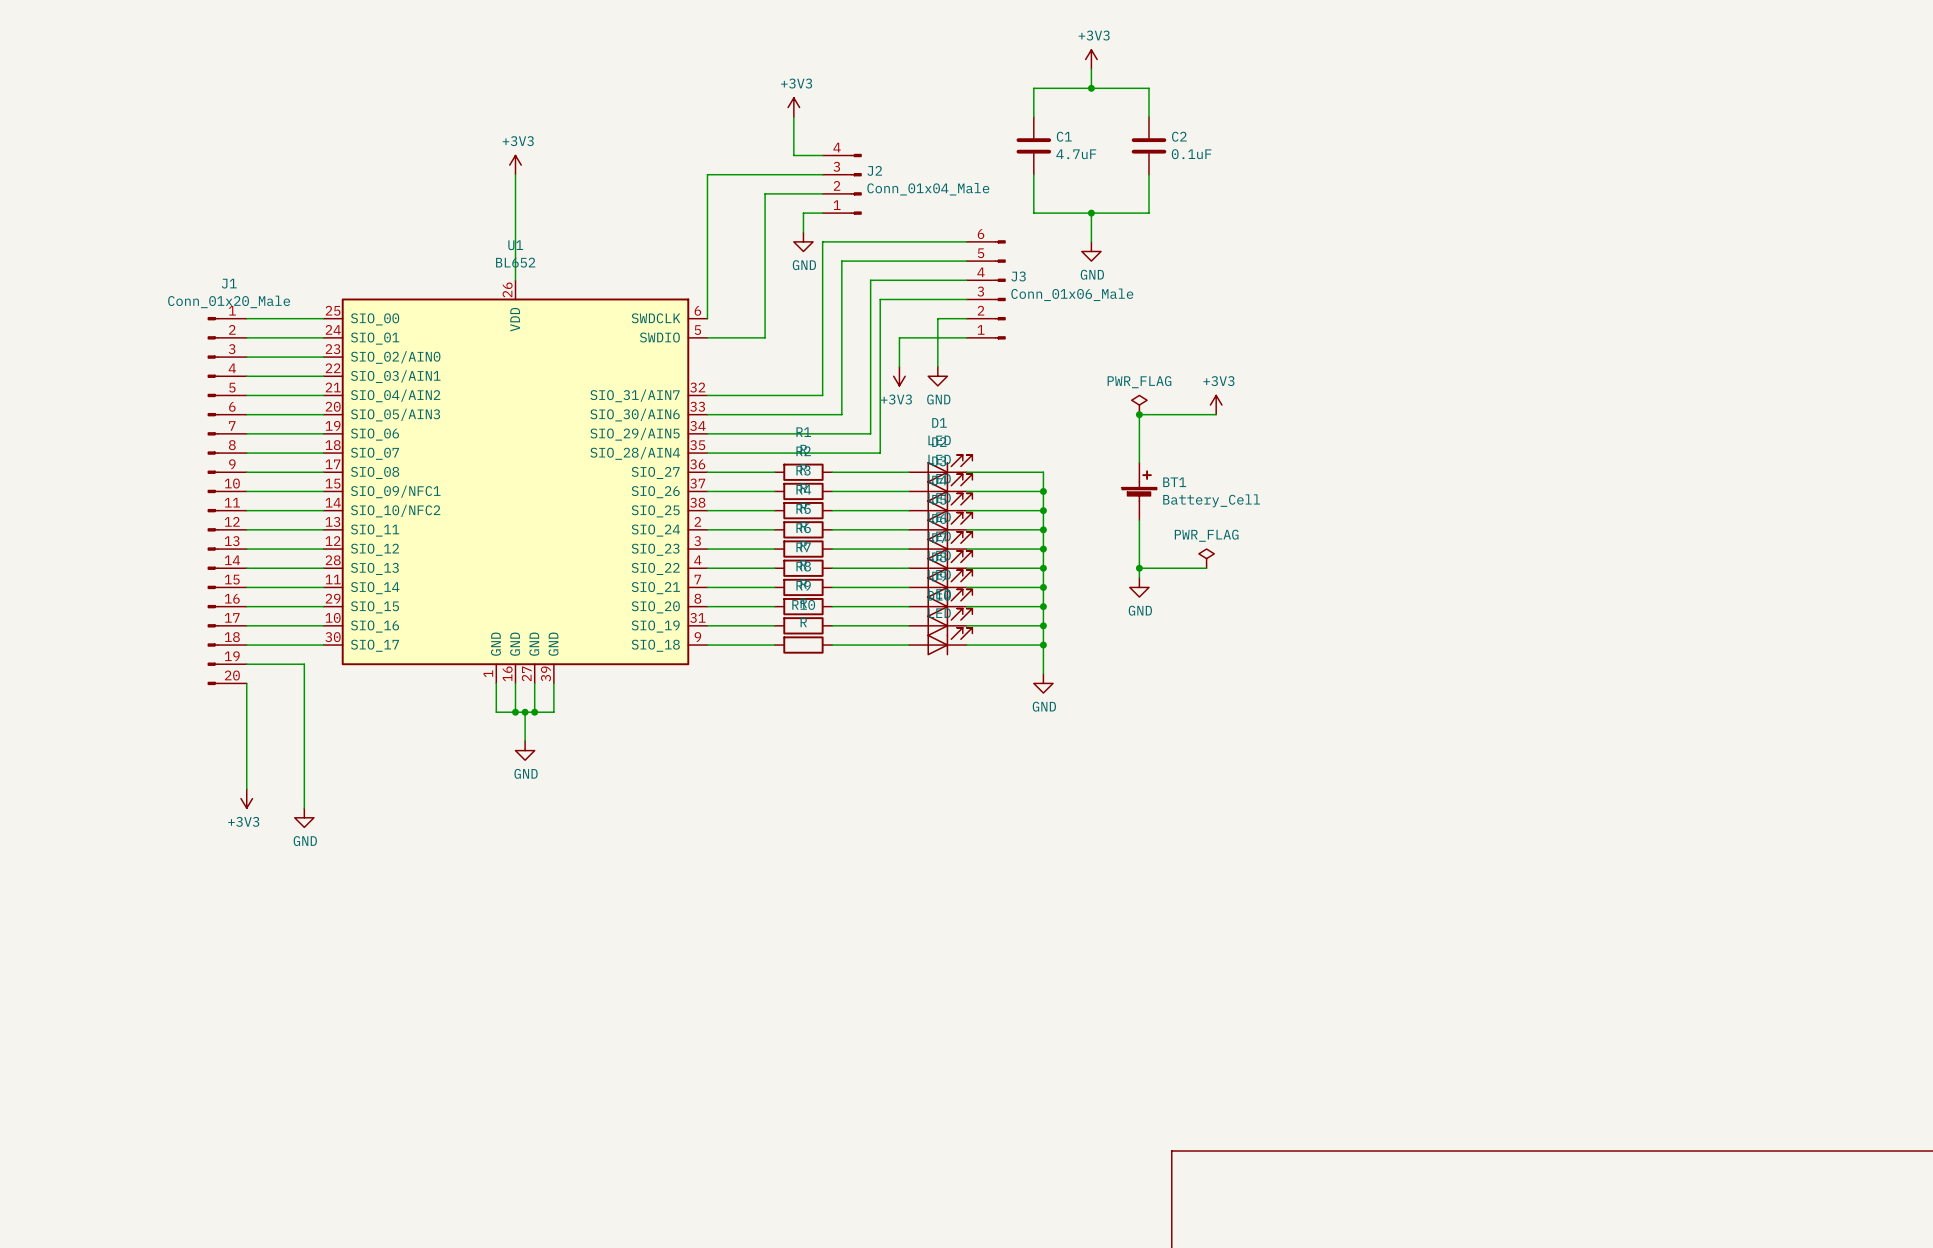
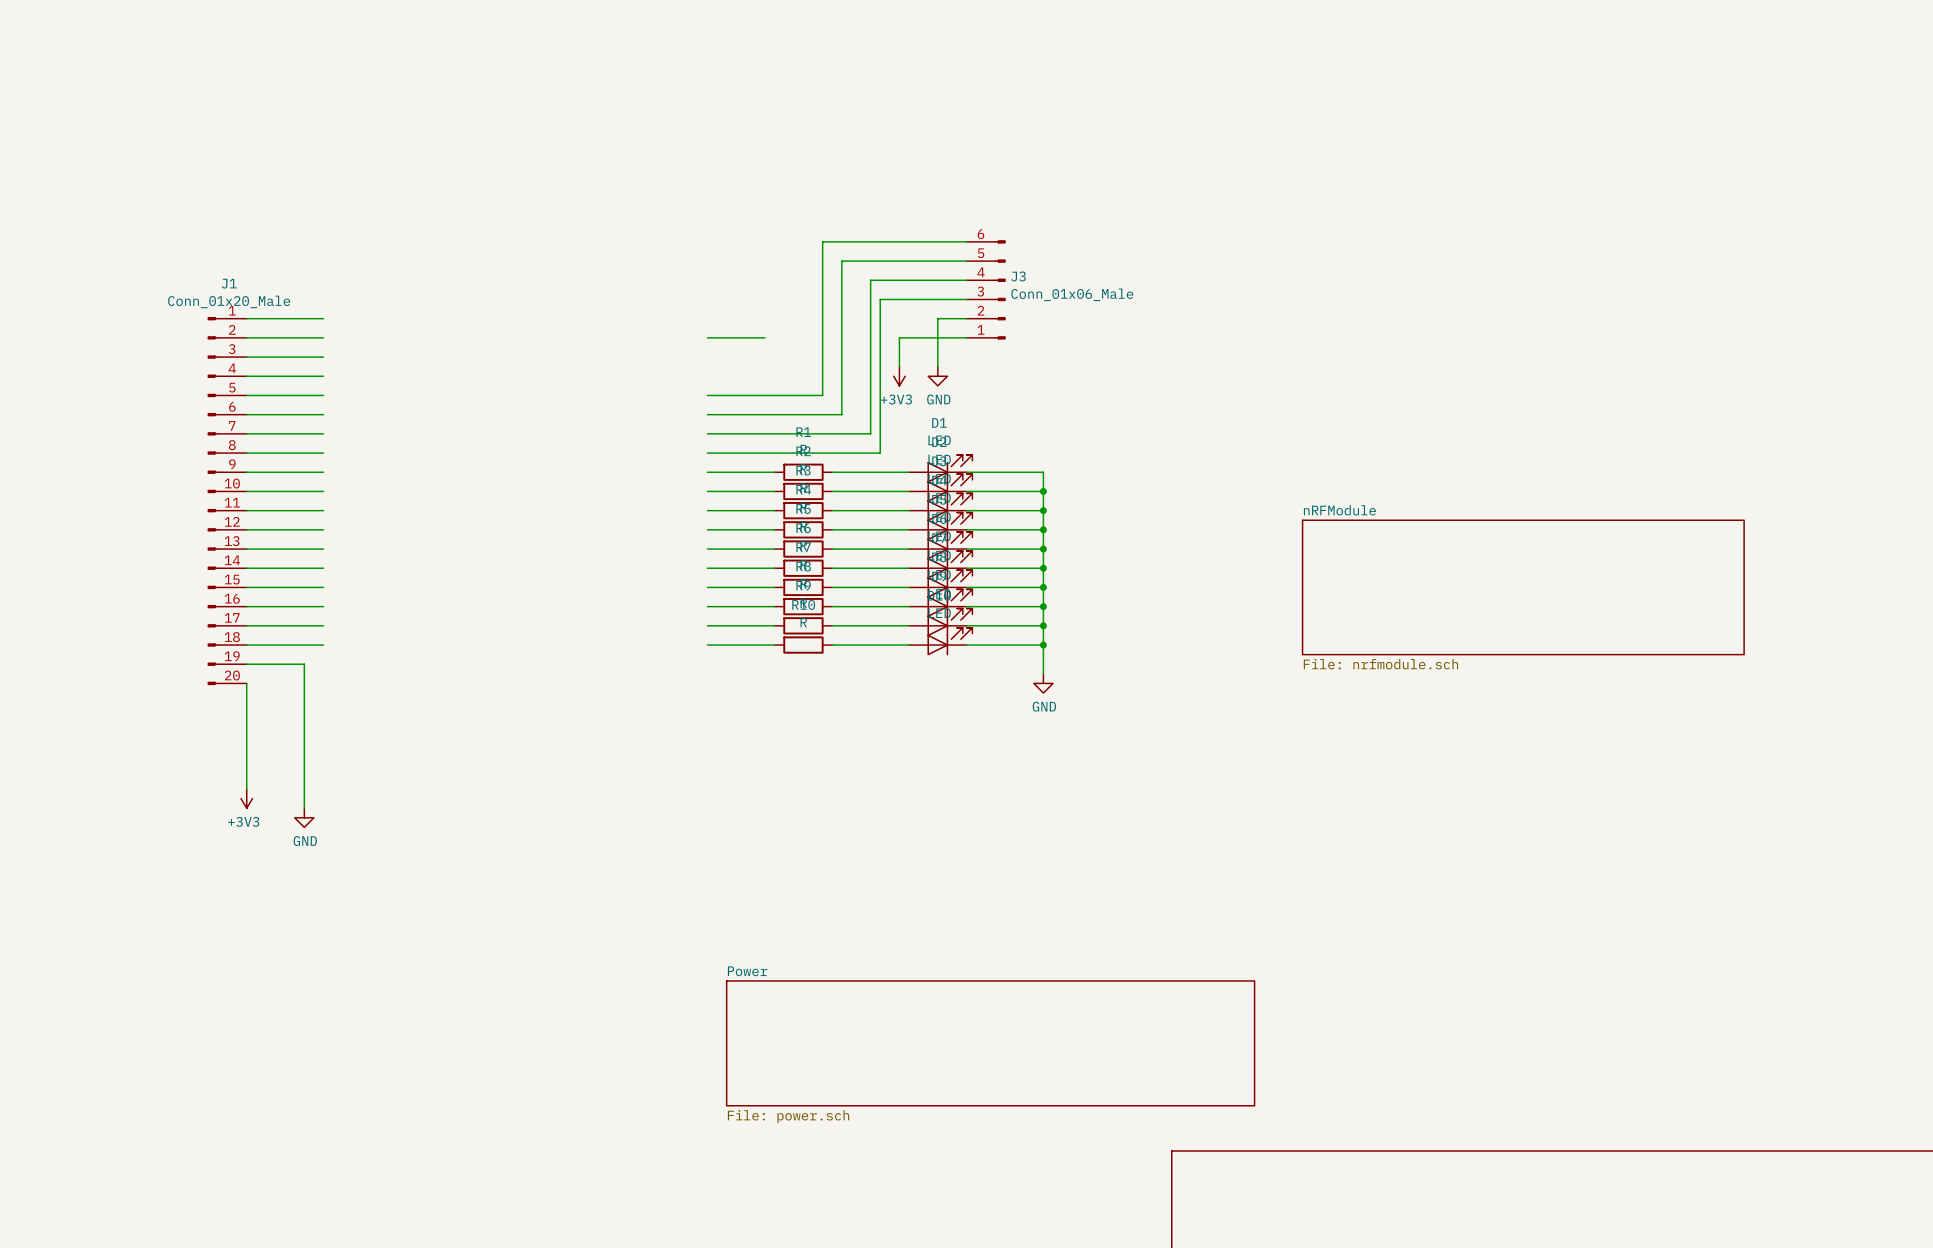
power symbol: +3V3 (1091, 59) -> none
wire: (1091, 69) (1091, 88) -> none
junction: (1091, 88) -> none
power symbol: +3V3 (793, 107) -> none
wire: (793, 117) (793, 155) (822, 155) -> none
wire: (1033, 117) (1033, 88) (1148, 88) (1148, 117) -> none
C1: 4.7uF (1033, 145) -> none
C2: 0.1uF (1148, 145) -> none
power symbol: +3V3 (515, 165) -> none
wire: (515, 174) (515, 280) -> none
wire: (822, 174) (707, 174) (707, 318) -> none
wire: (1033, 174) (1033, 213) (1148, 213) (1148, 174) -> none
J2: Conn_01x04_Male (842, 184) -> none
wire: (822, 193) (765, 193) (765, 337) -> none
wire: (822, 213) (803, 213) (803, 232) -> none
wire: (1091, 213) (1091, 241) -> none
junction: (1091, 213) -> none
power symbol: GND (803, 241) -> none
power symbol: GND (1091, 251) -> none
power symbol: PWR_FLAG (1139, 405) -> none
power symbol: +3V3 (1216, 405) -> none
junction: (1139, 414) -> none
wire: (1216, 414) (1139, 414) (1139, 462) -> none
U1: BL652 (515, 481) -> none
BT1: Battery_Cell (1139, 491) -> none
wire: (1139, 520) (1139, 577) -> none
power symbol: PWR_FLAG (1206, 558) -> none
wire: (1139, 568) (1206, 568) -> none
junction: (1139, 568) -> none
power symbol: GND (1139, 587) -> none
sheet nRFModule: none -> File: nrfmodule.sch (1523, 587)
wire: (496, 683) (496, 712) (553, 712) (553, 683) -> none
wire: (515, 683) (515, 712) -> none
wire: (534, 683) (534, 712) -> none
junction: (515, 712) -> none
wire: (525, 712) (525, 741) -> none
junction: (525, 712) -> none
junction: (534, 712) -> none
power symbol: GND (525, 750) -> none
sheet Power: none -> File: power.sch (990, 1043)

